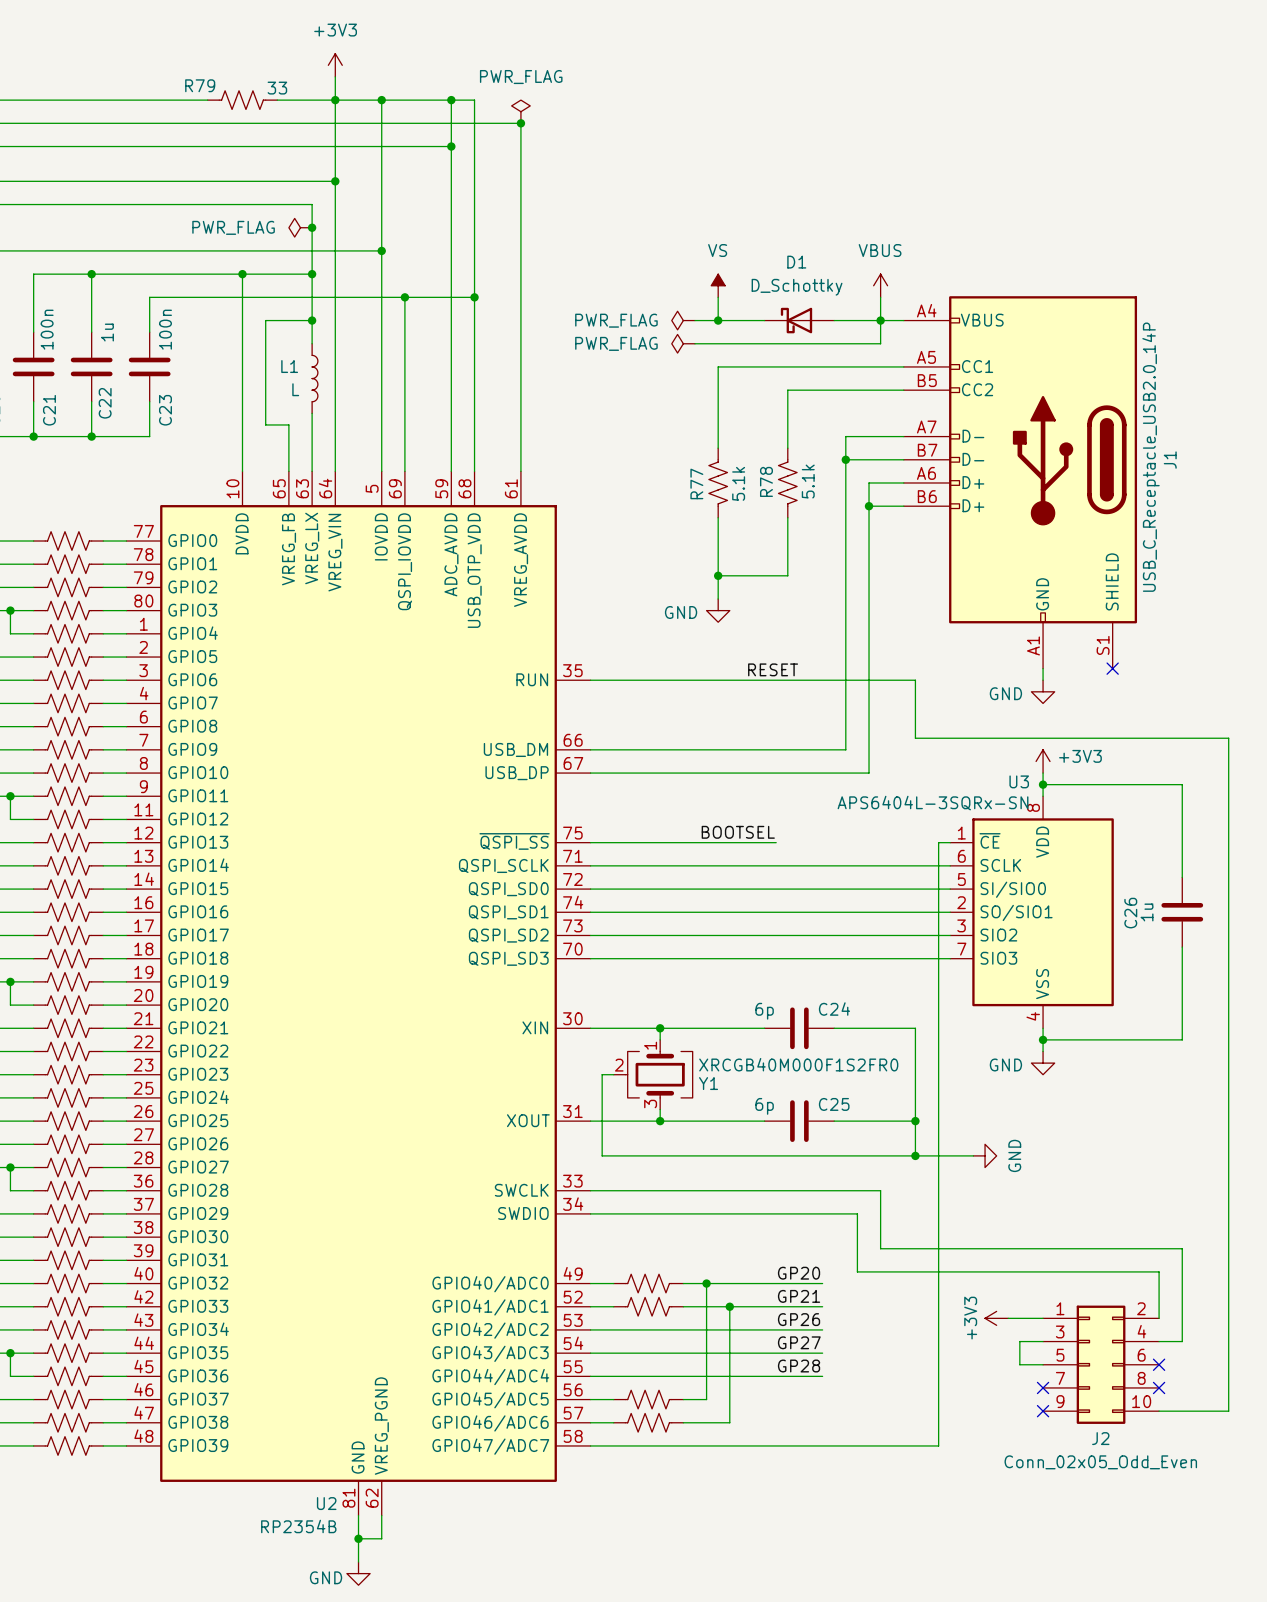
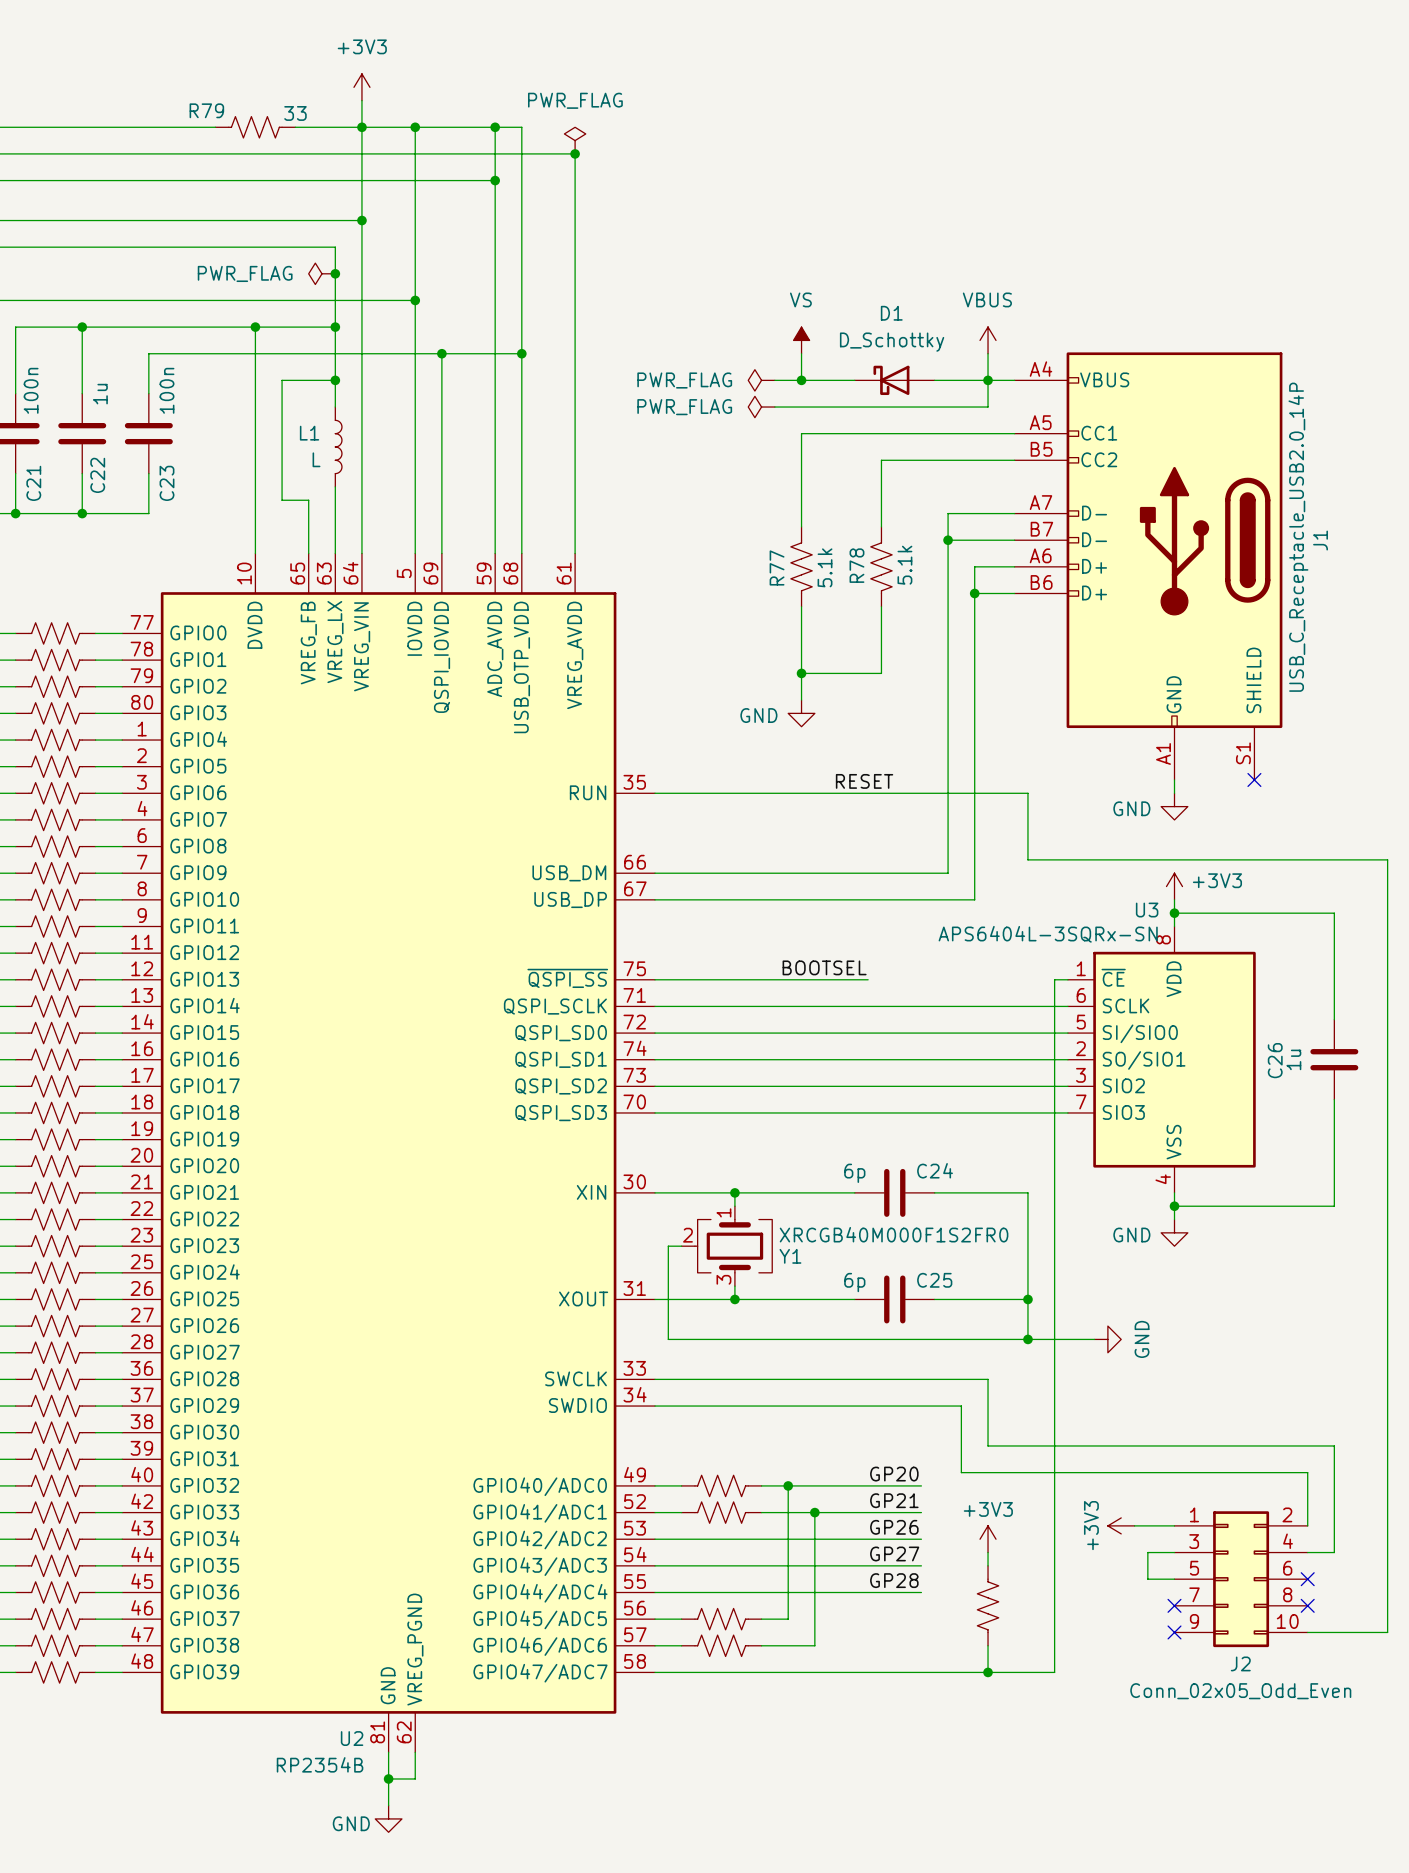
power symbol: none -> +3V3 (988, 1539)
wire: none -> (988, 1552) (988, 1565)
part: none -> (988, 1605)
wire: none -> (988, 1645) (988, 1672)
junction: none -> (988, 1672)

